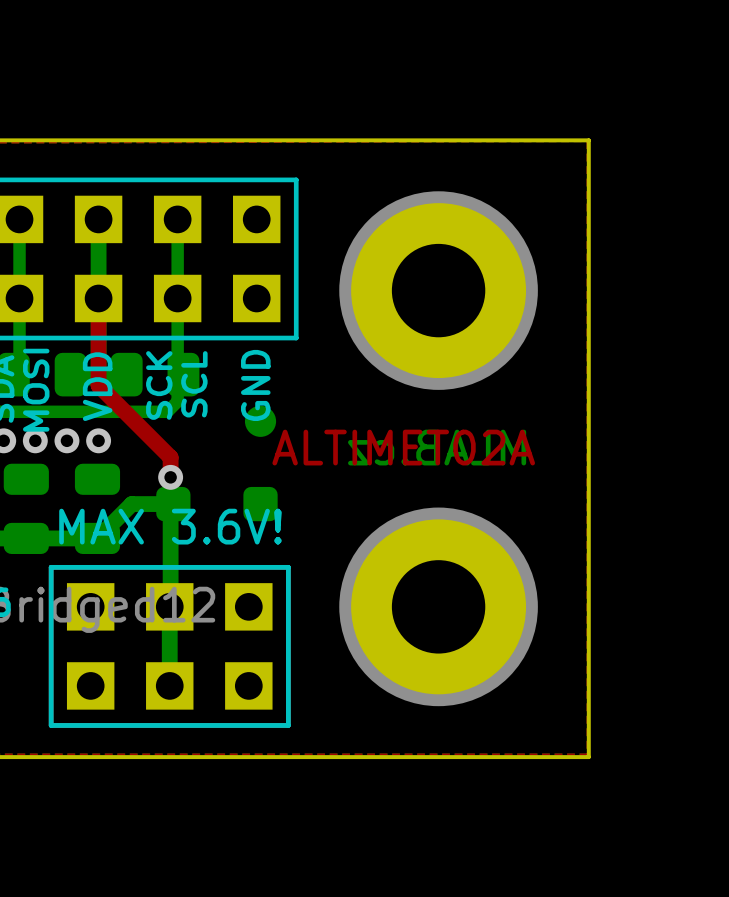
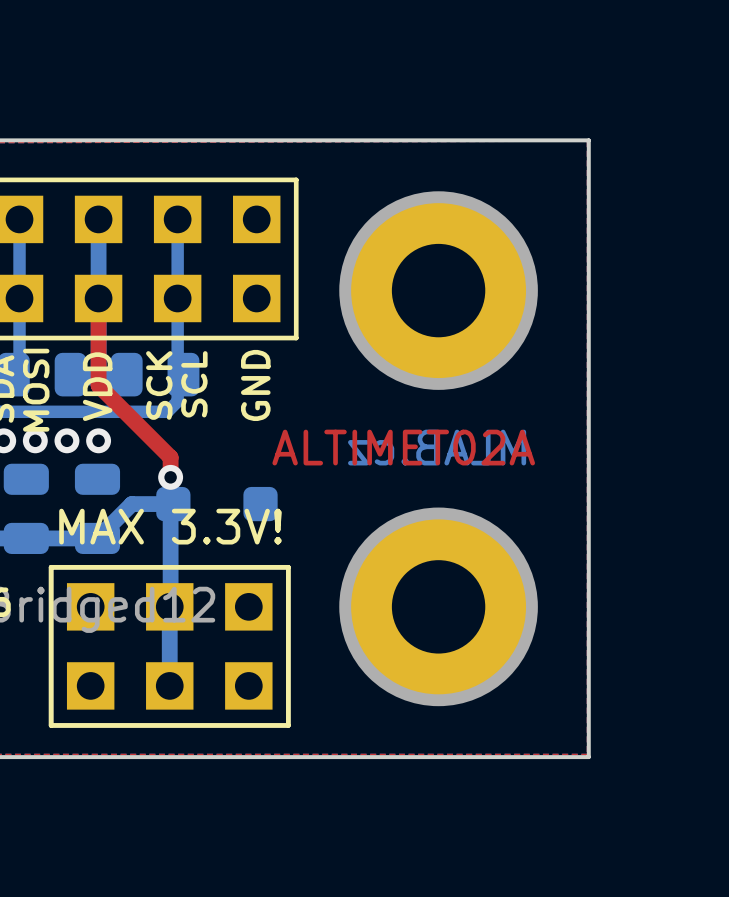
part: (260, 421) -> none
text: MAX 3.6V! (170, 526) -> MAX 3.3V! (170, 526)

